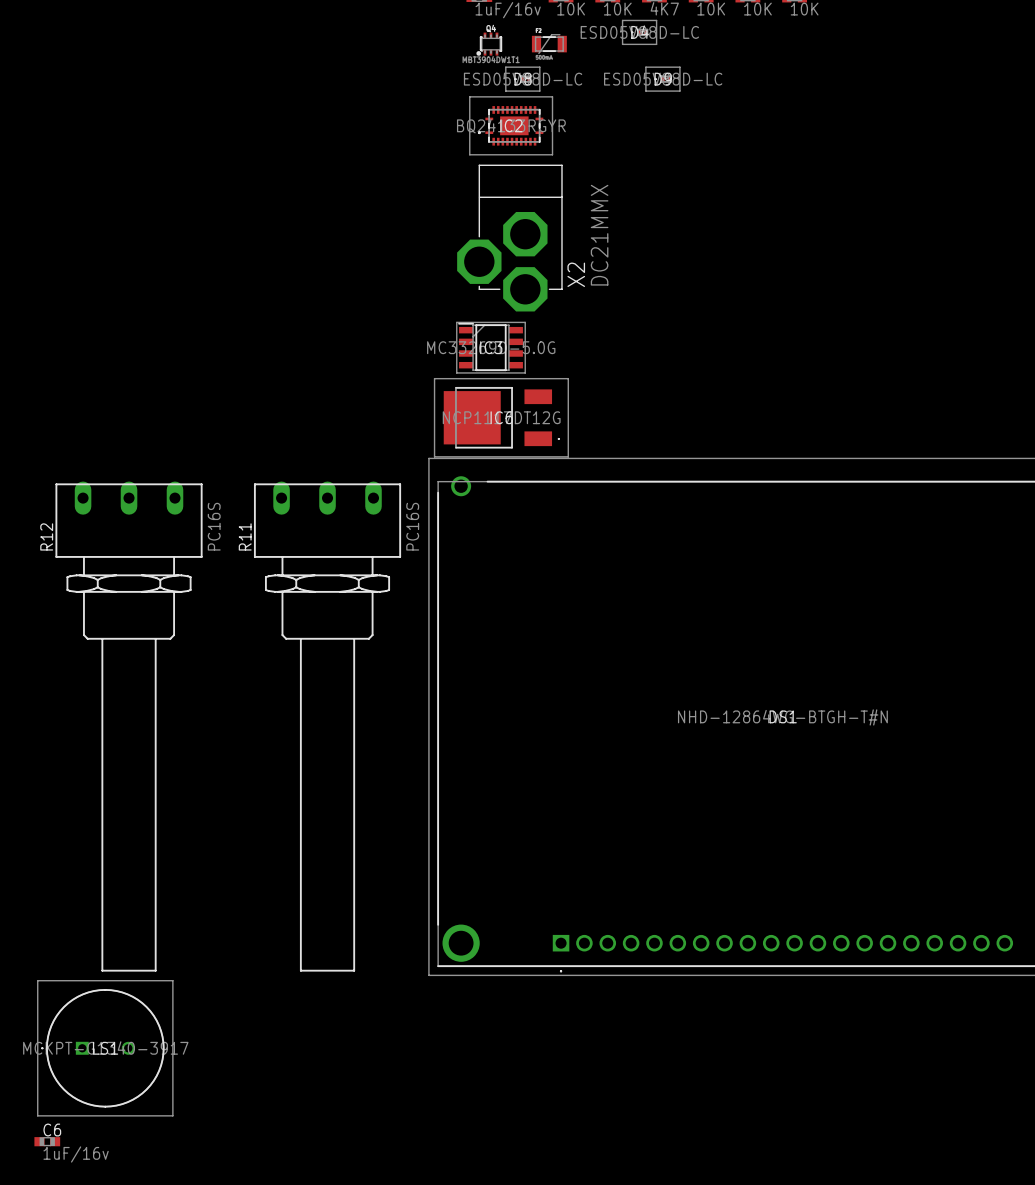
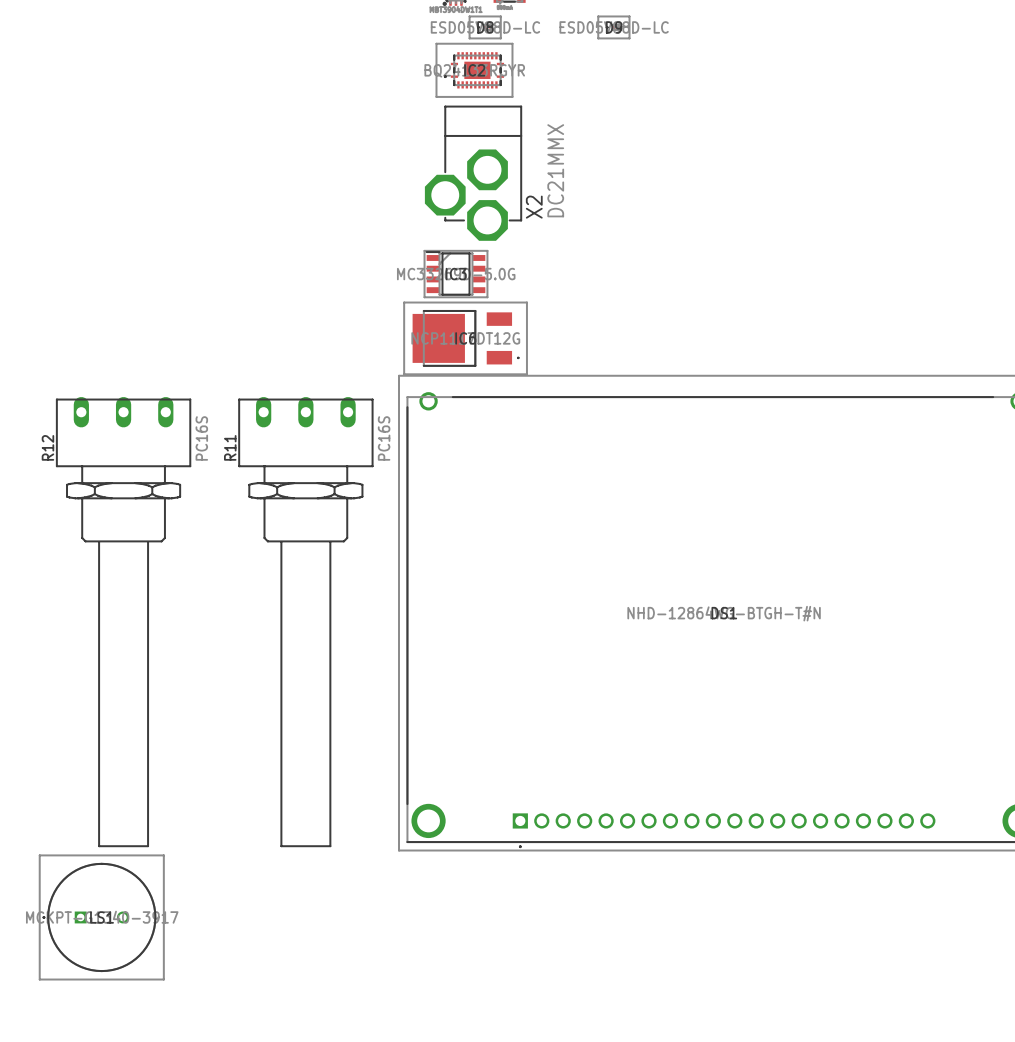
C6: 1uF/16v (47, 1141) -> none

